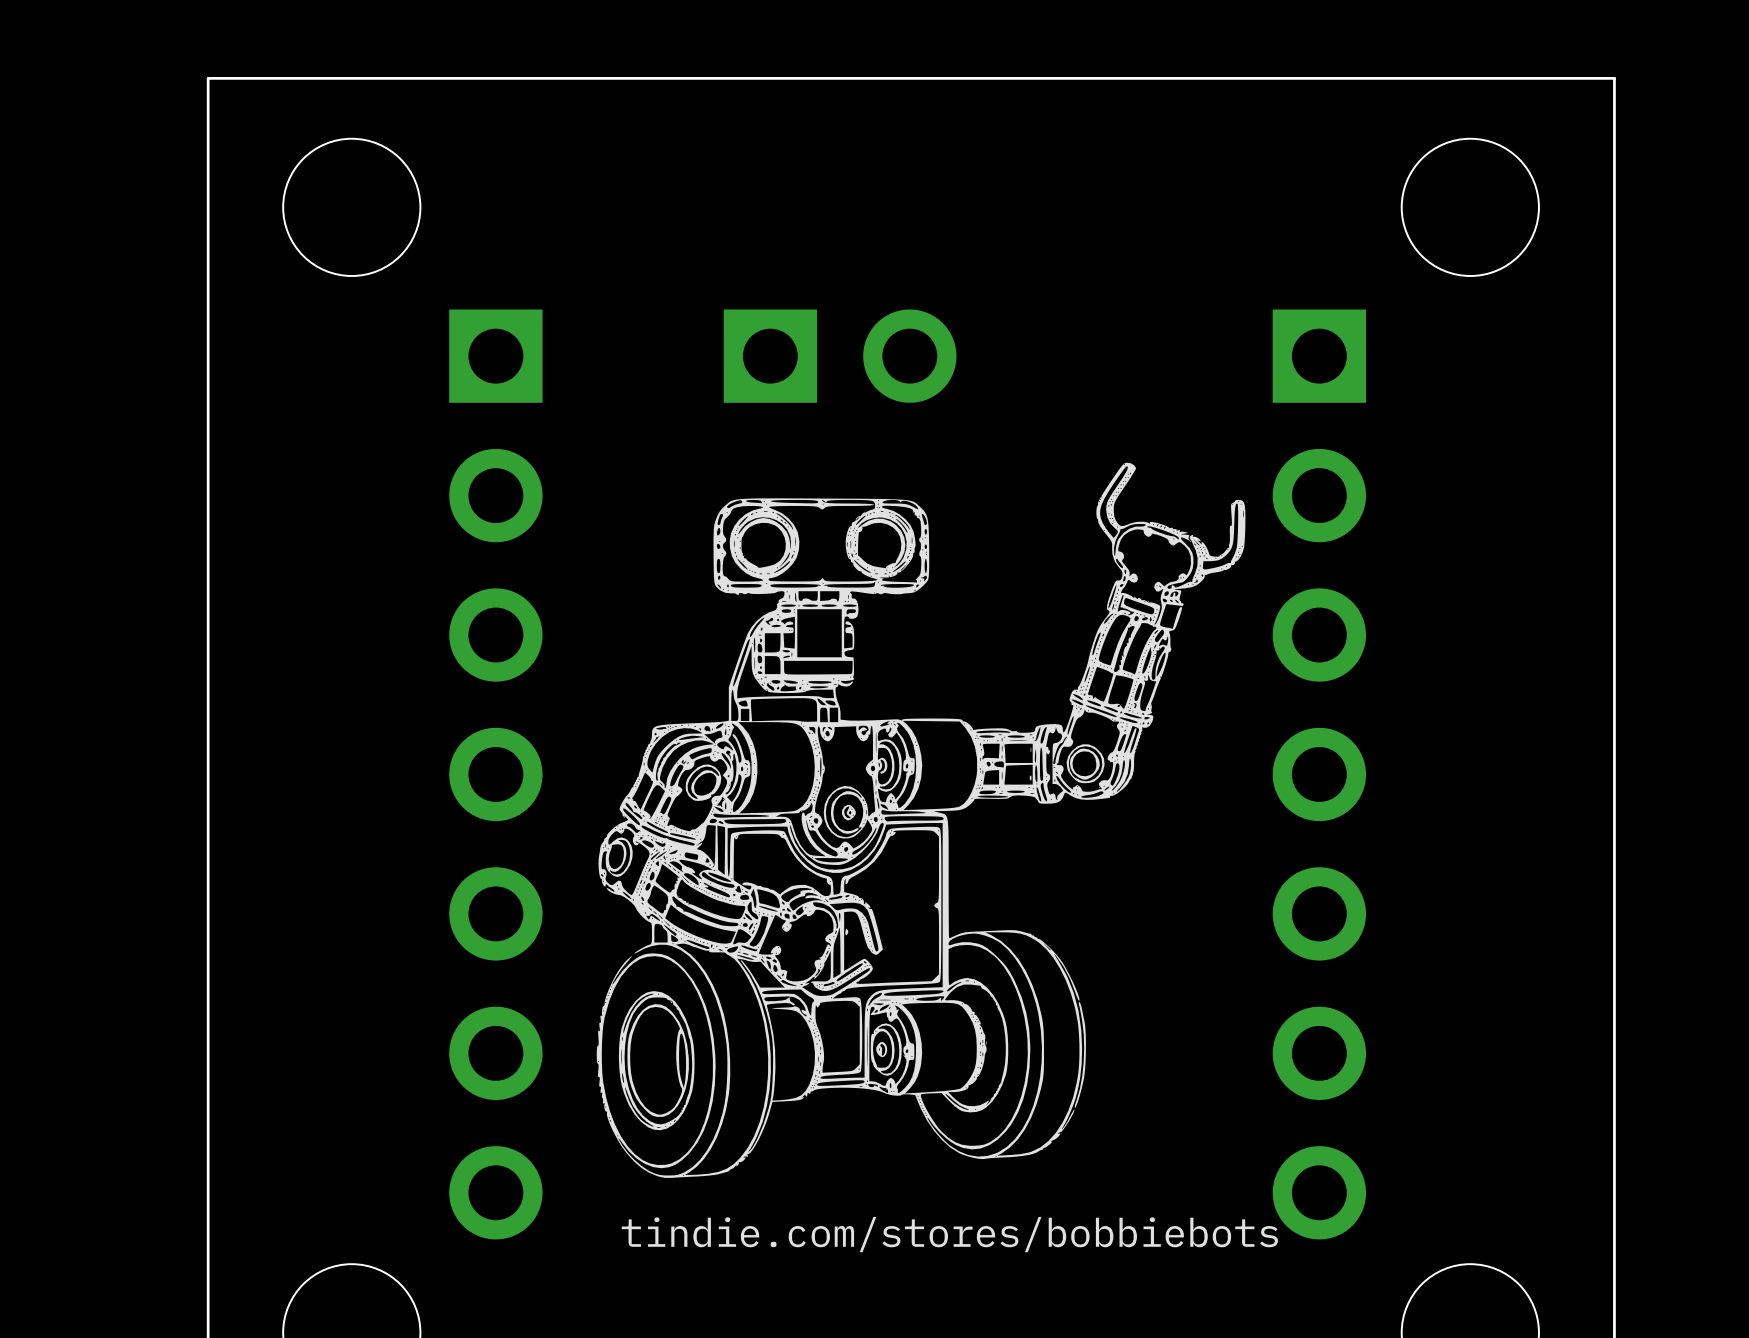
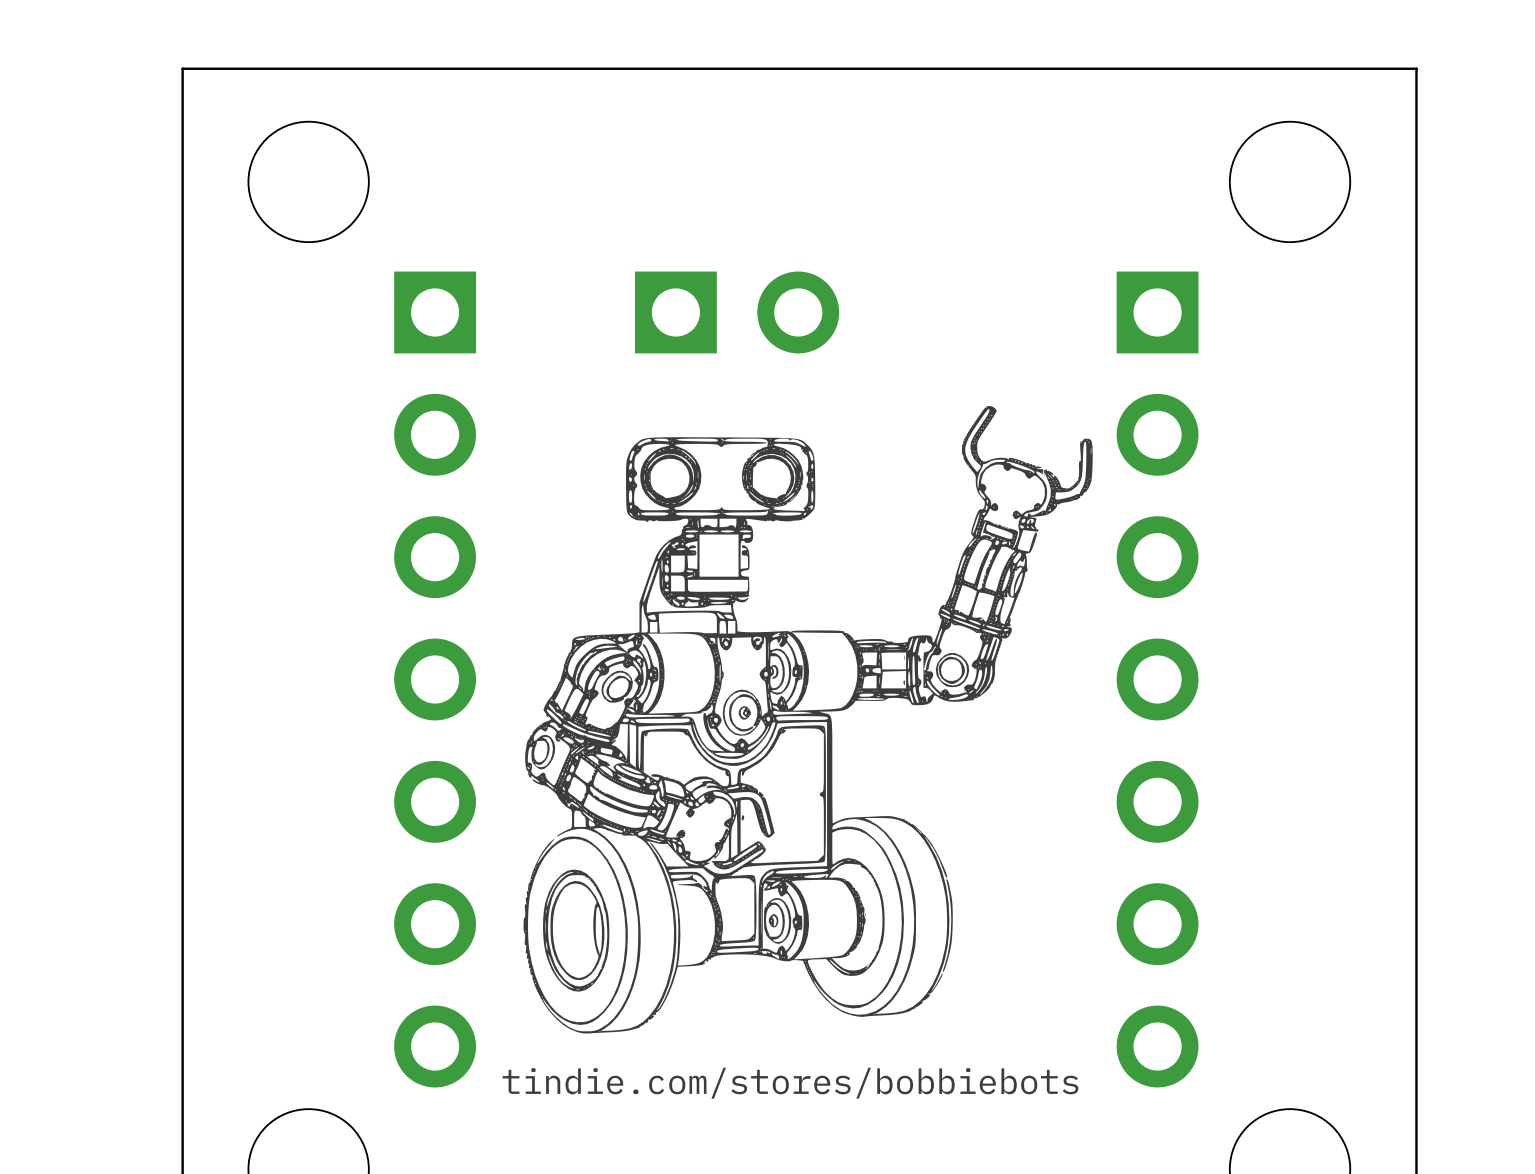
text position: tindie.com/stores/bobbiebots (949, 1234) -> tindie.com/stores/bobbiebots (790, 1083)

